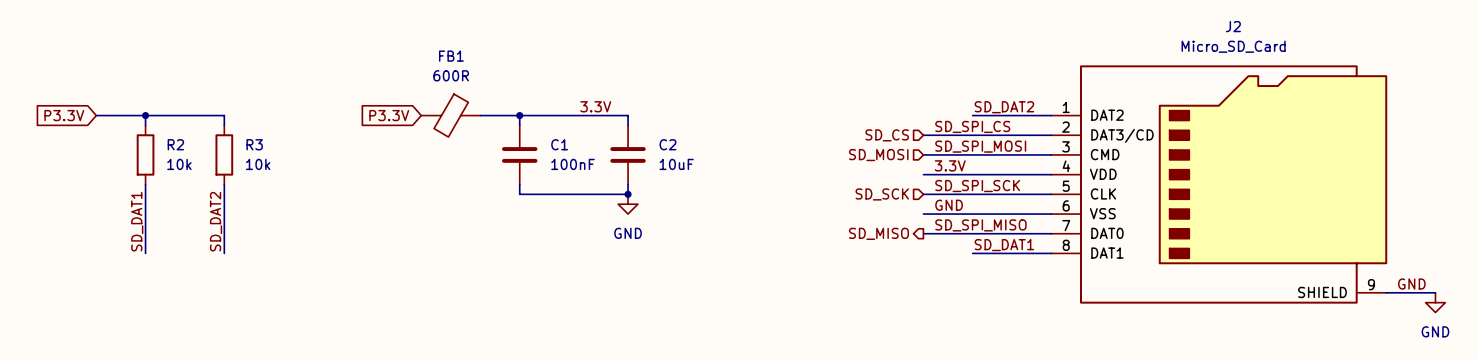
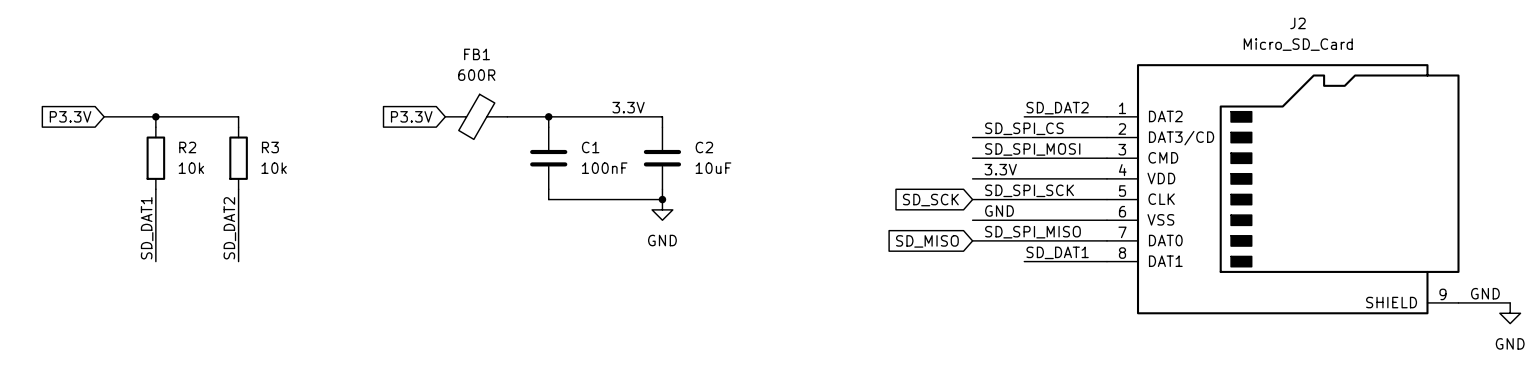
hierarchical label: SD_CS (887, 135) -> none
hierarchical label: SD_MOSI (878, 155) -> none
hierarchical label: SD_SCK (882, 194) -> none
global label: none -> SD_SCK (930, 200)
hierarchical label: SD_MISO (878, 233) -> none
global label: none -> SD_MISO (927, 241)

